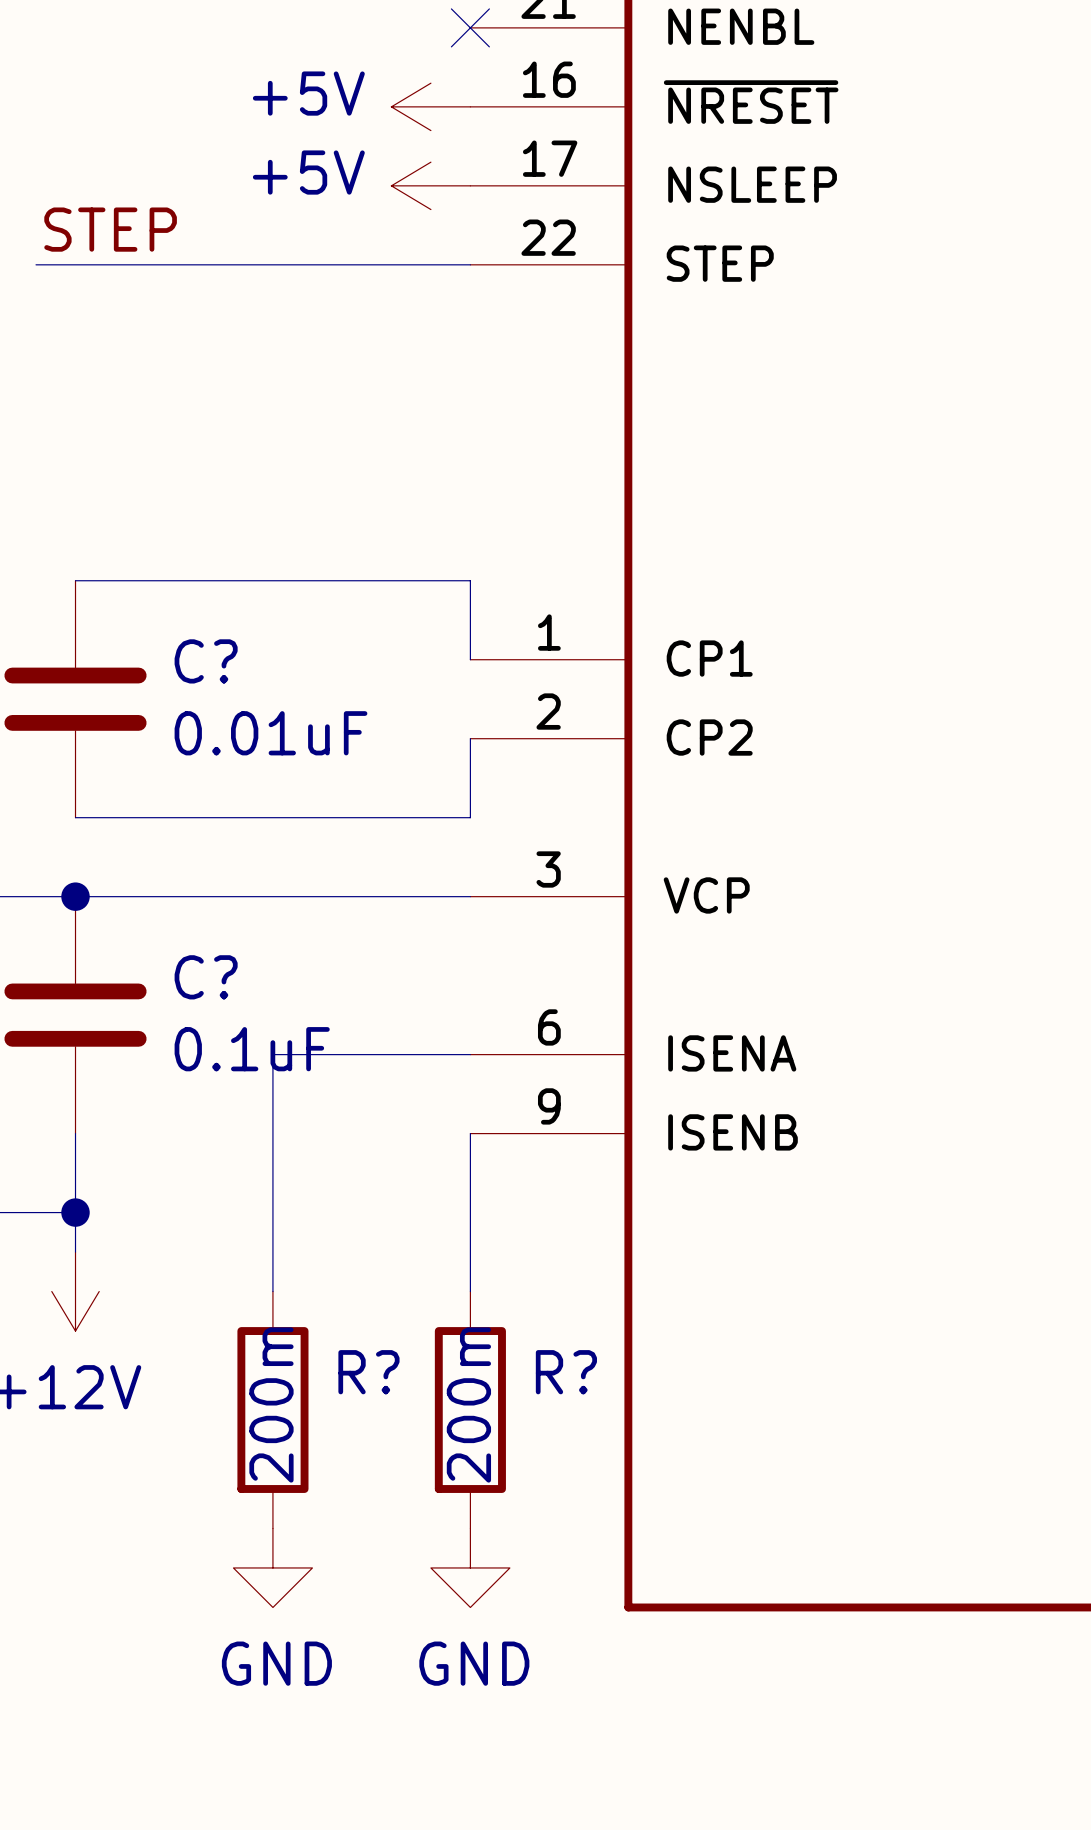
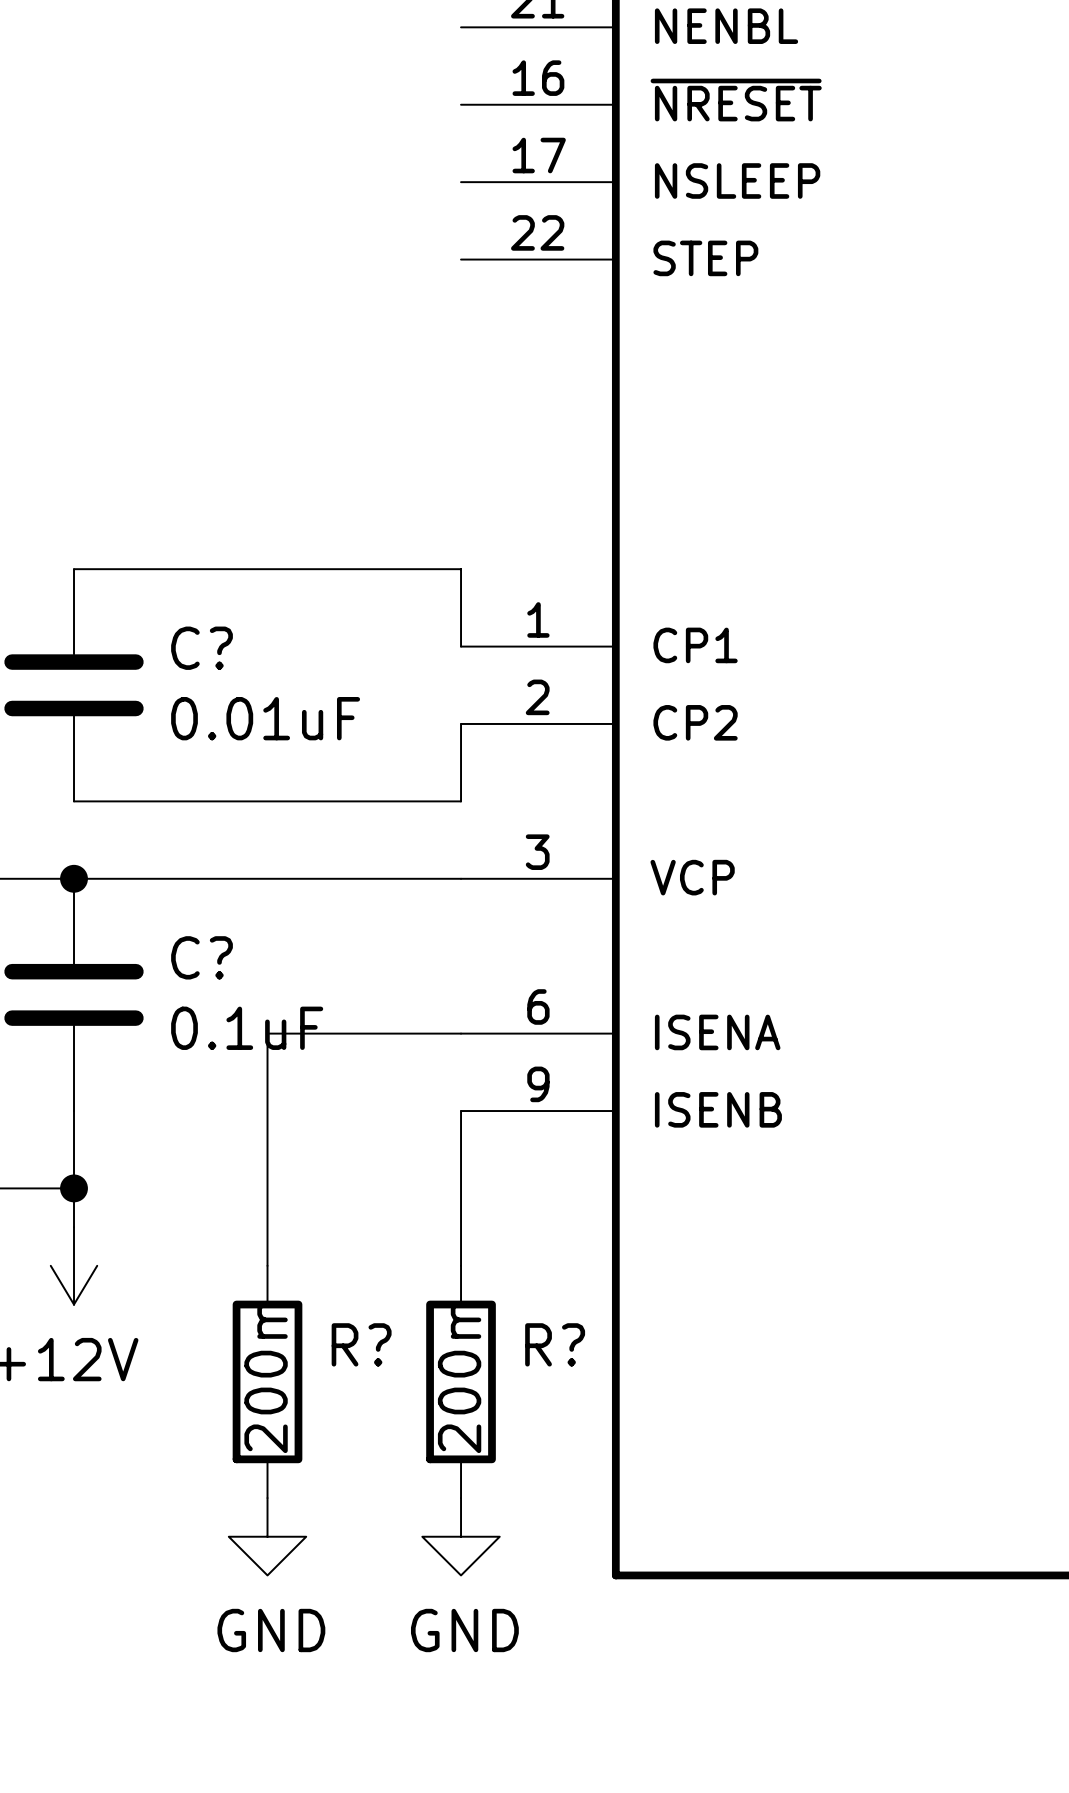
no-connect mark: (470, 27) -> none
power symbol: +5V (430, 106) -> none
power symbol: +5V (430, 185) -> none
label: STEP (110, 229) -> none
wire: (36, 264) (470, 264) -> none

